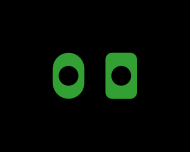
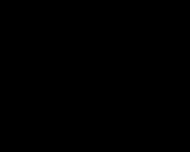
part: (94, 75) -> none

